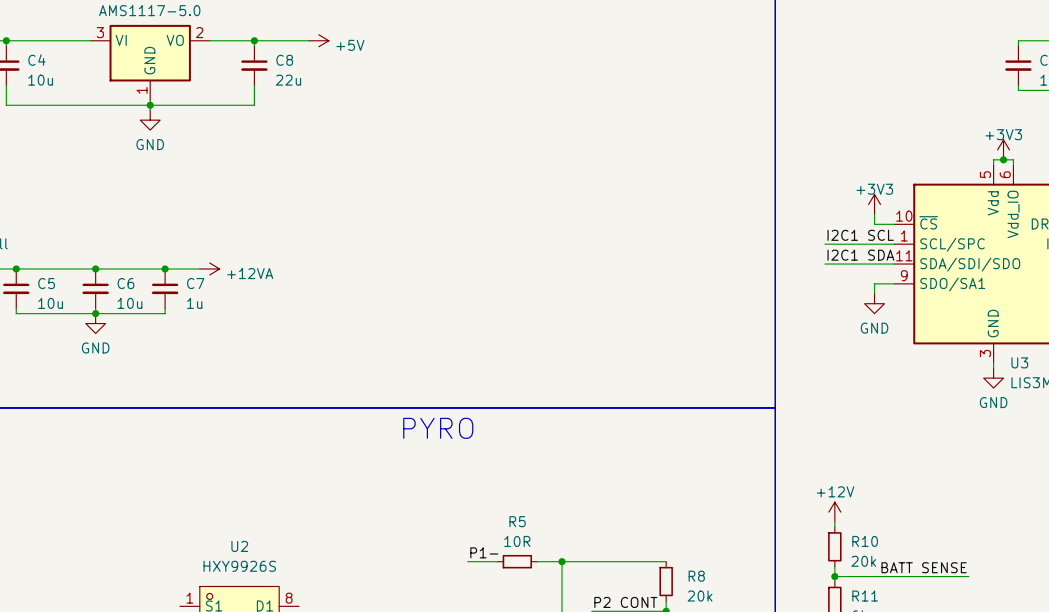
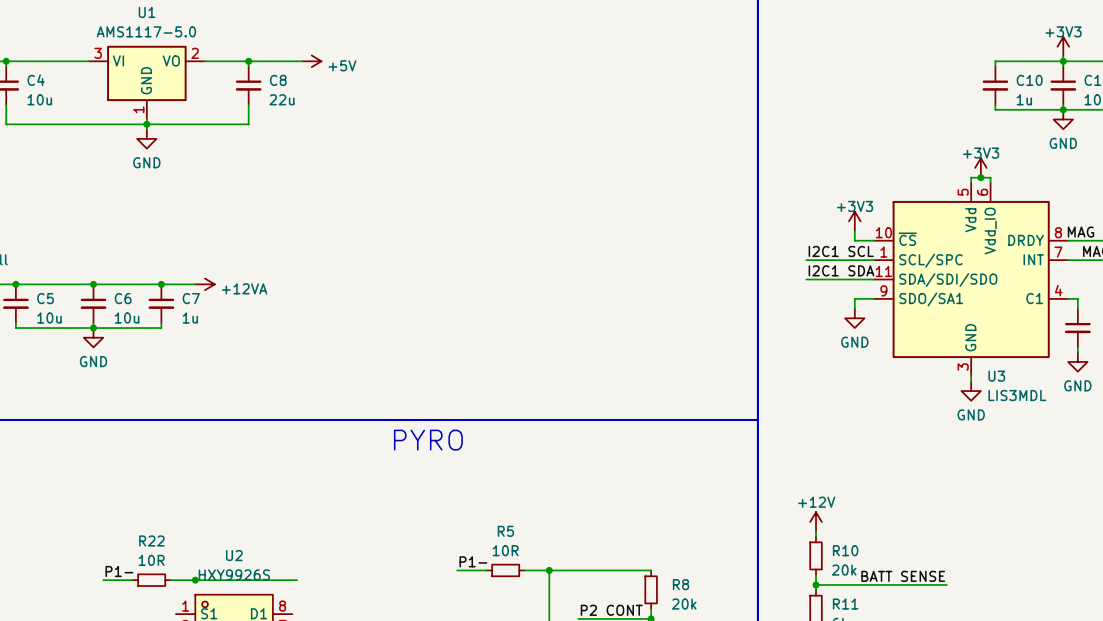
label: none -> P1- (119, 571)
wire: none -> (103, 580) (132, 580)
R22: none -> 10R (151, 580)
wire: none -> (171, 580) (297, 580)
junction: none -> (195, 580)

